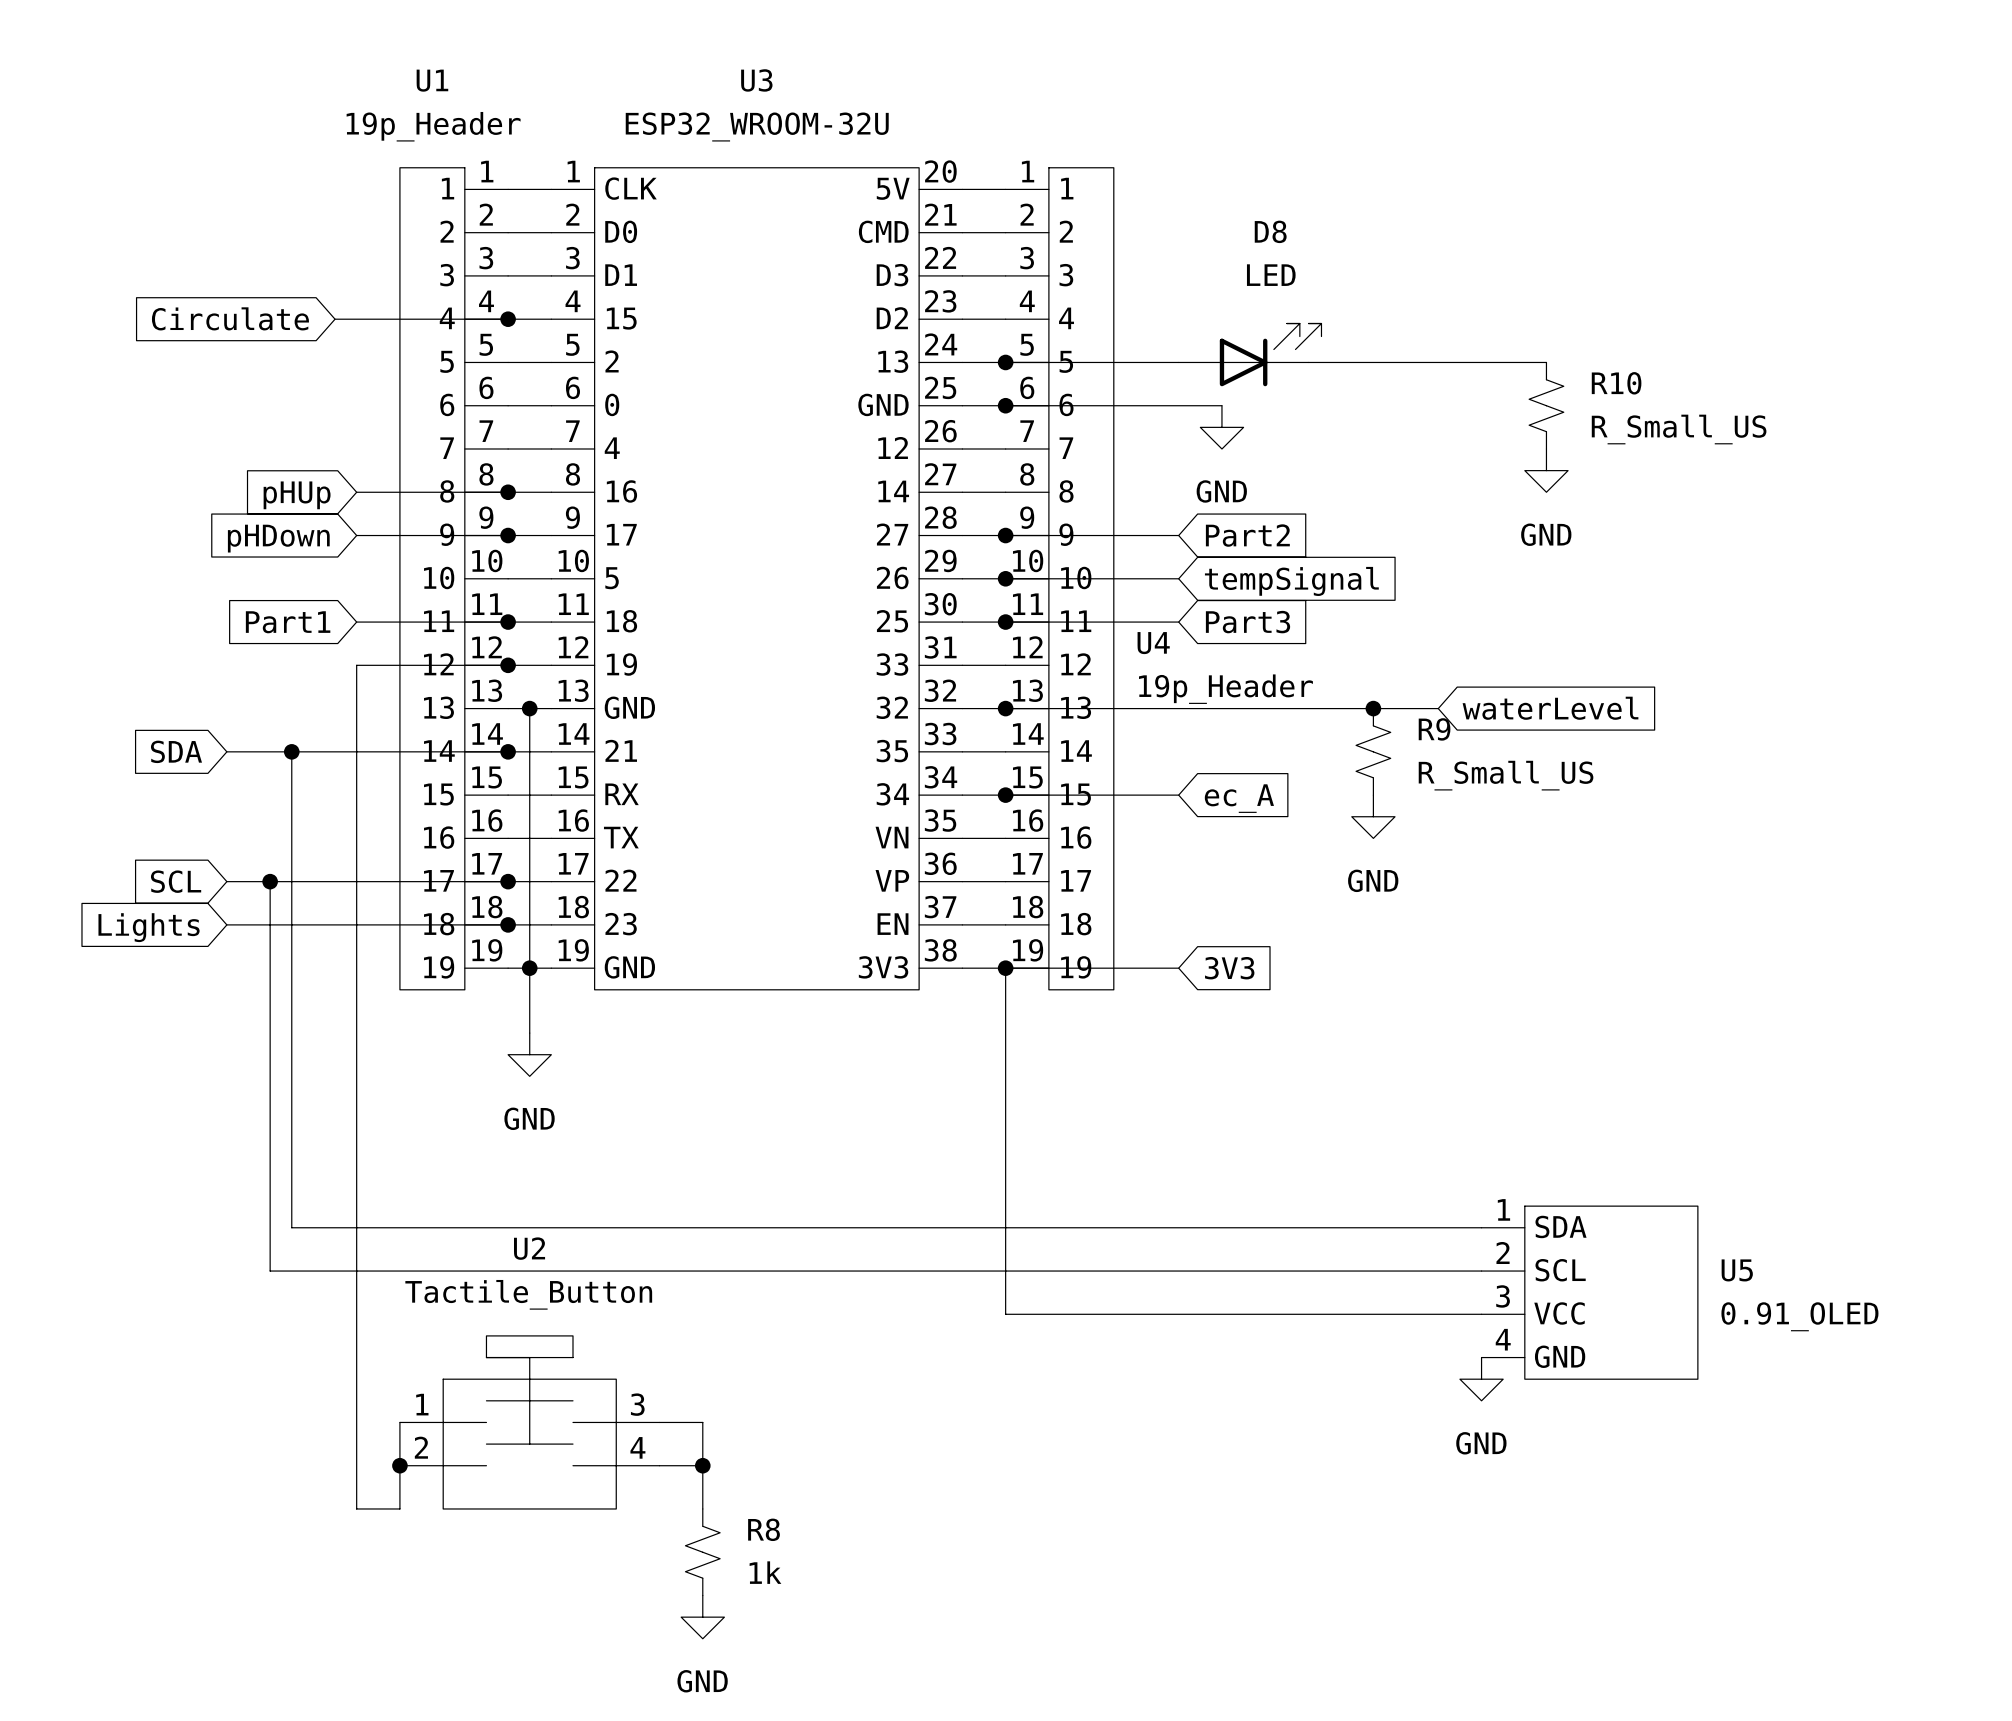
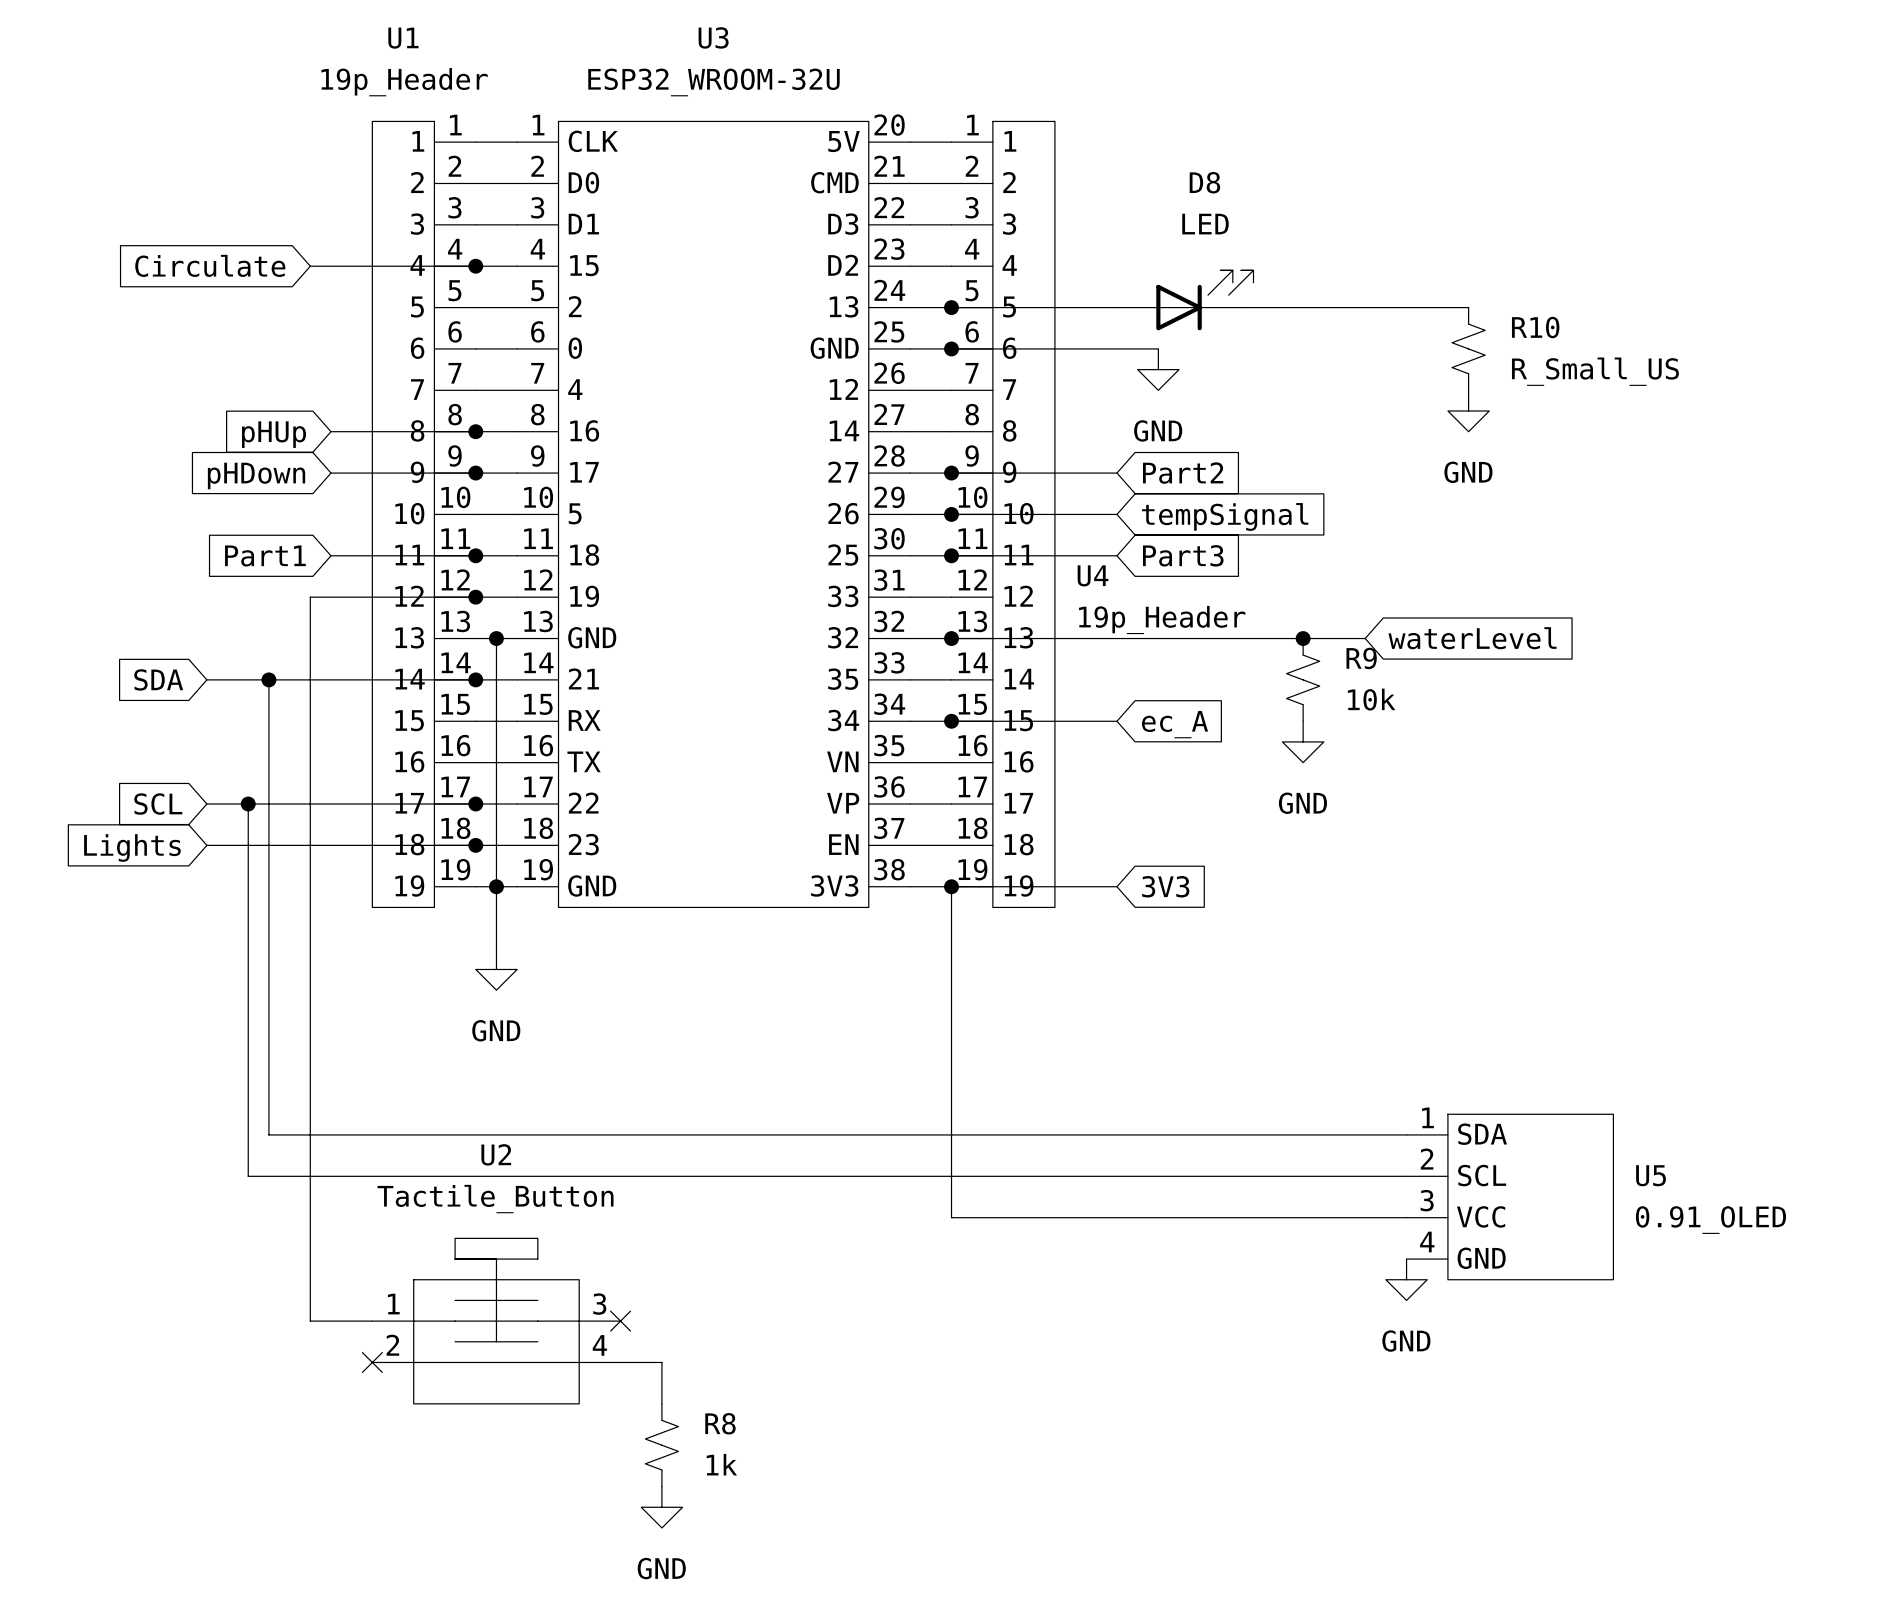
wire: (356, 665) (356, 1508) (399, 1508) (399, 1422) -> (330, 597) (310, 597) (310, 1321) (372, 1321)
R9 value: R_Small_US (1506, 775) -> 10k (1371, 699)
U2 symbol: [399, 1335, 660, 1509] -> [372, 1238, 621, 1404]
wire: (659, 1422) (702, 1422) (702, 1465) -> none
no-connect mark: none -> (620, 1321)
junction: (399, 1465) -> none
no-connect mark: none -> (372, 1362)
junction: (702, 1465) -> none

